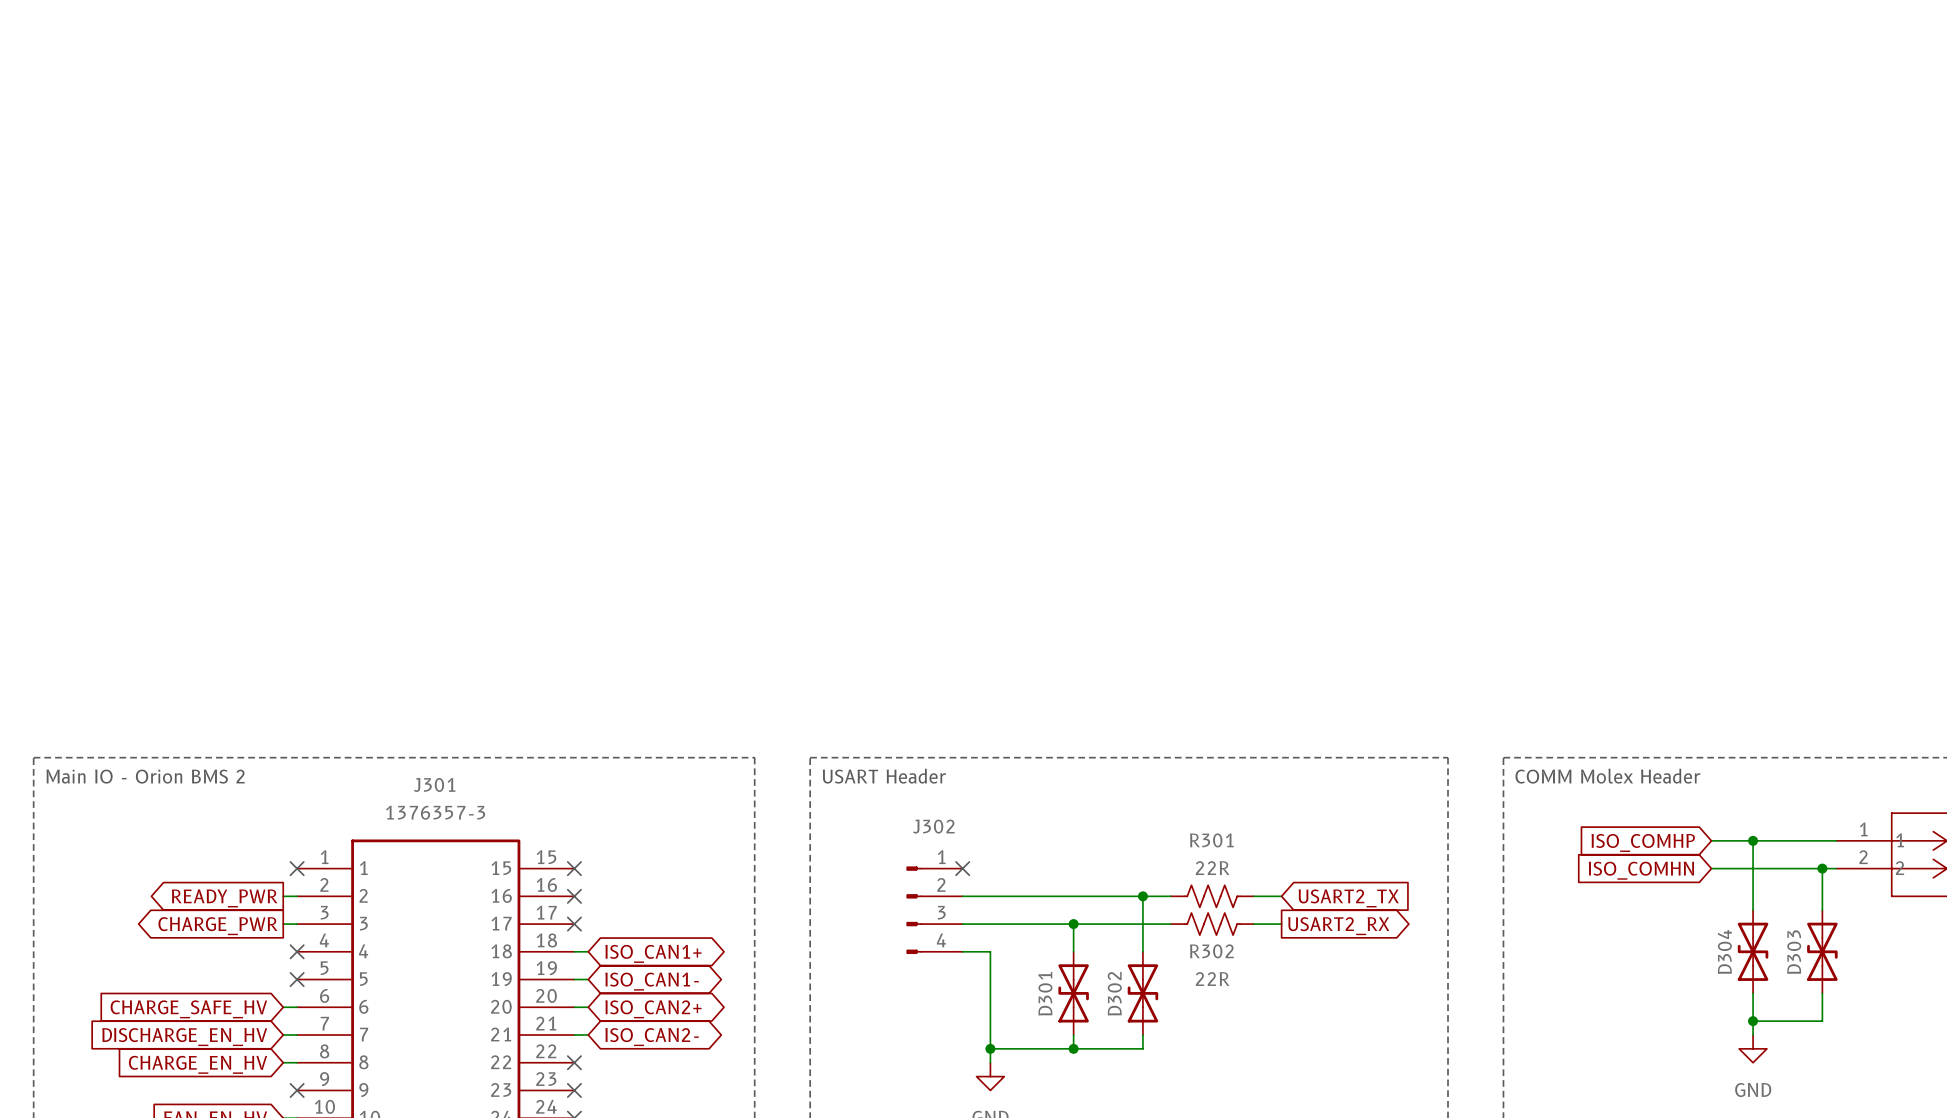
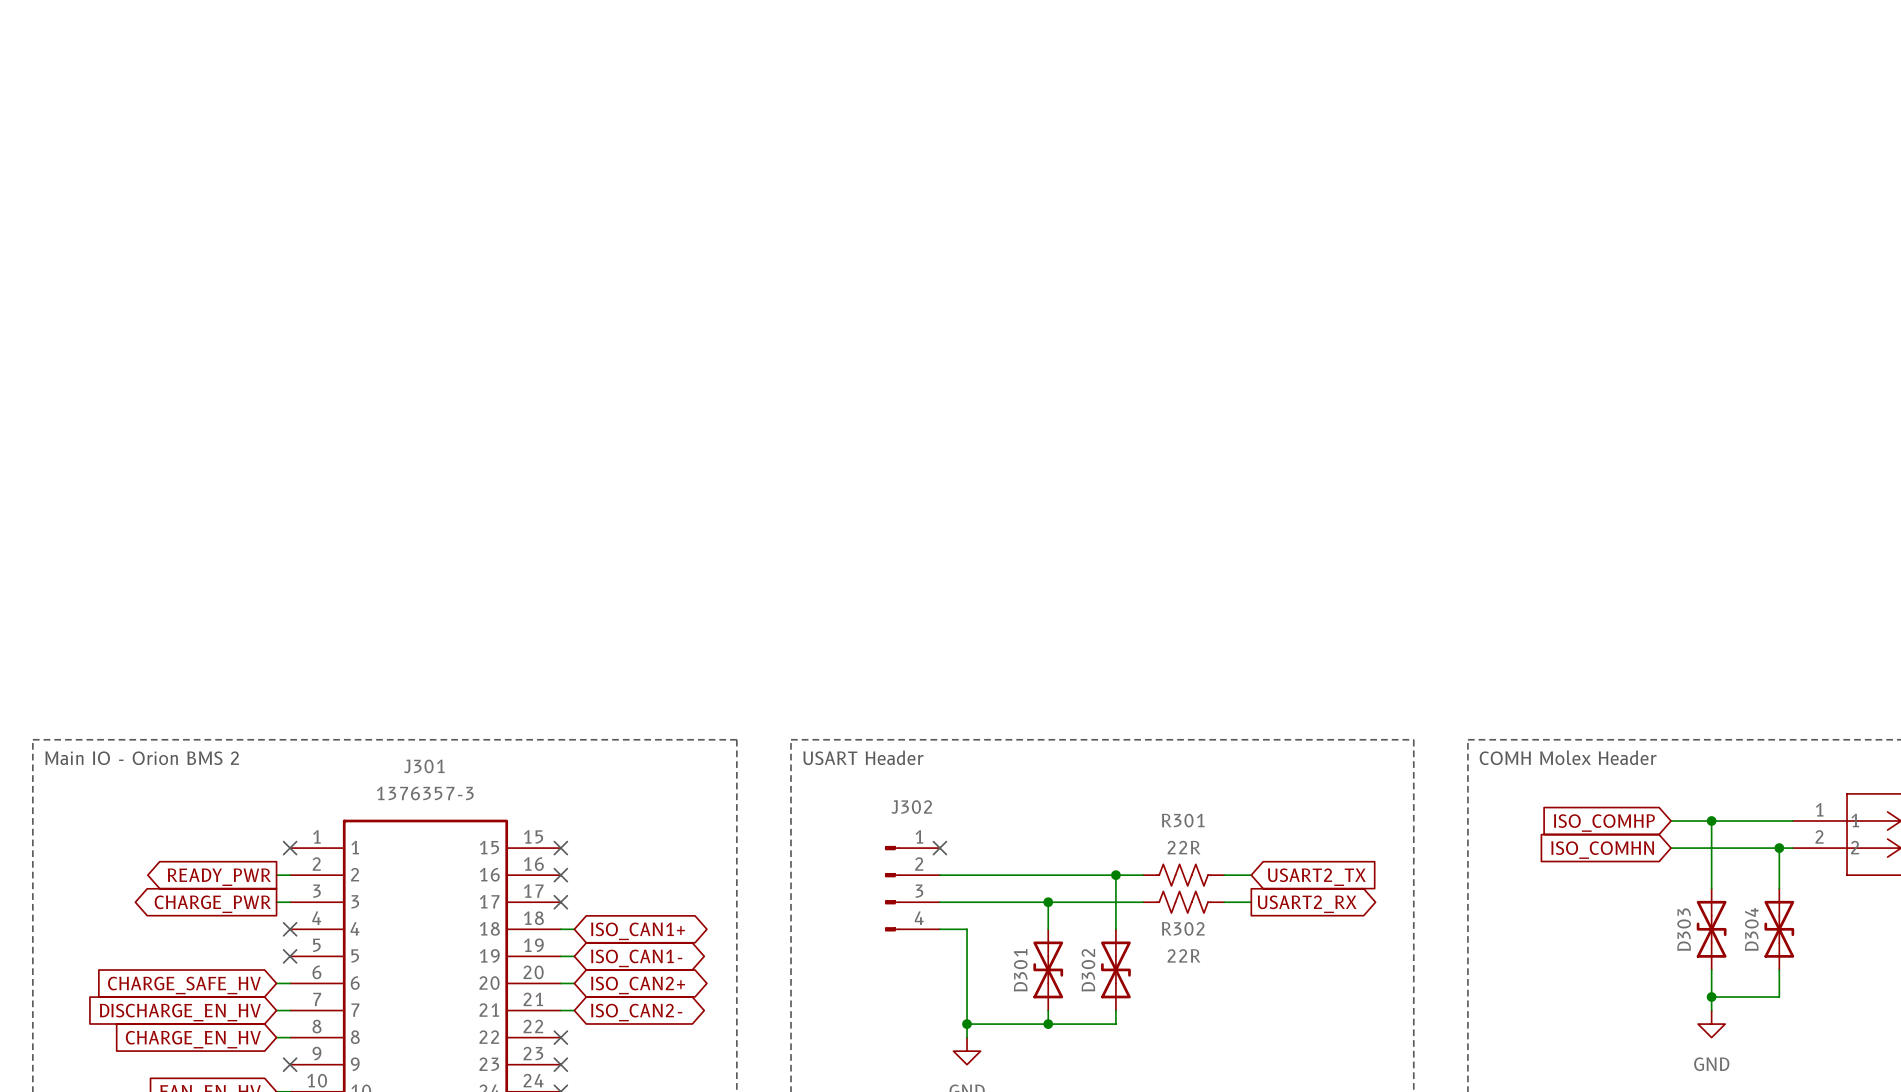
text: COMM Molex Header (1607, 776) -> COMH Molex Header (1568, 757)
D304 name: D304 (1724, 951) -> D303 (1684, 929)
D303 name: D303 (1794, 952) -> D304 (1751, 929)

